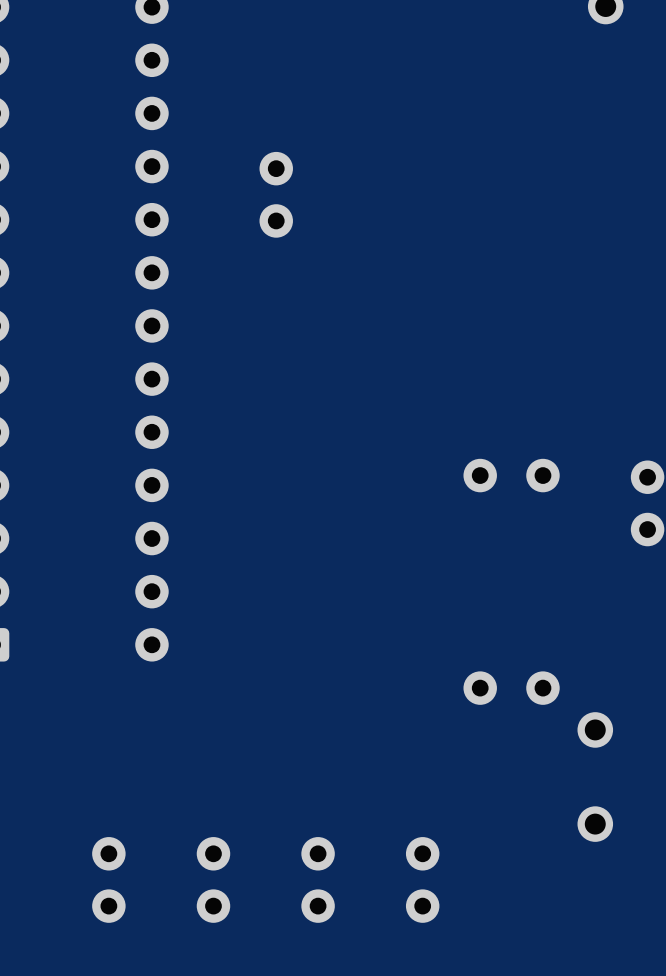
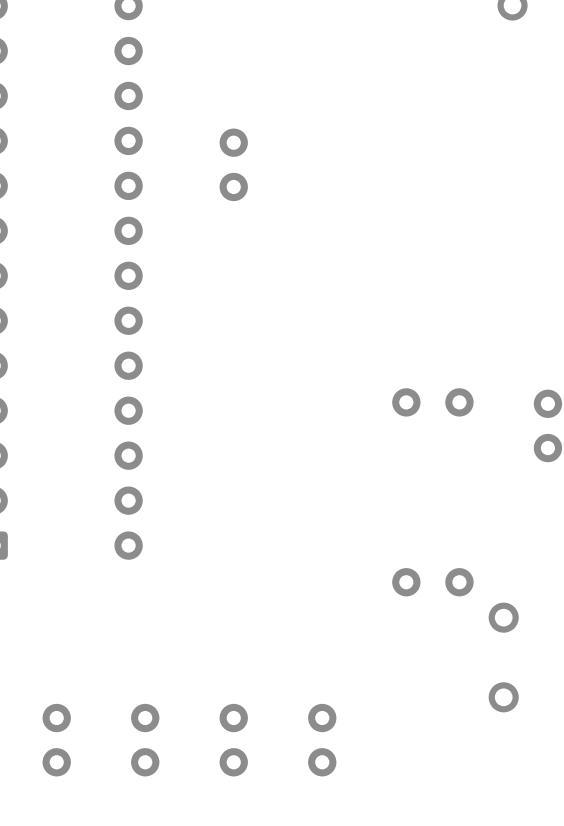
part: none -> (56, 740)
part: none -> (145, 740)
part: none -> (233, 740)
part: none -> (322, 740)
part: (108, 879) -> none
part: (213, 879) -> none
part: (318, 879) -> none
part: (422, 879) -> none

